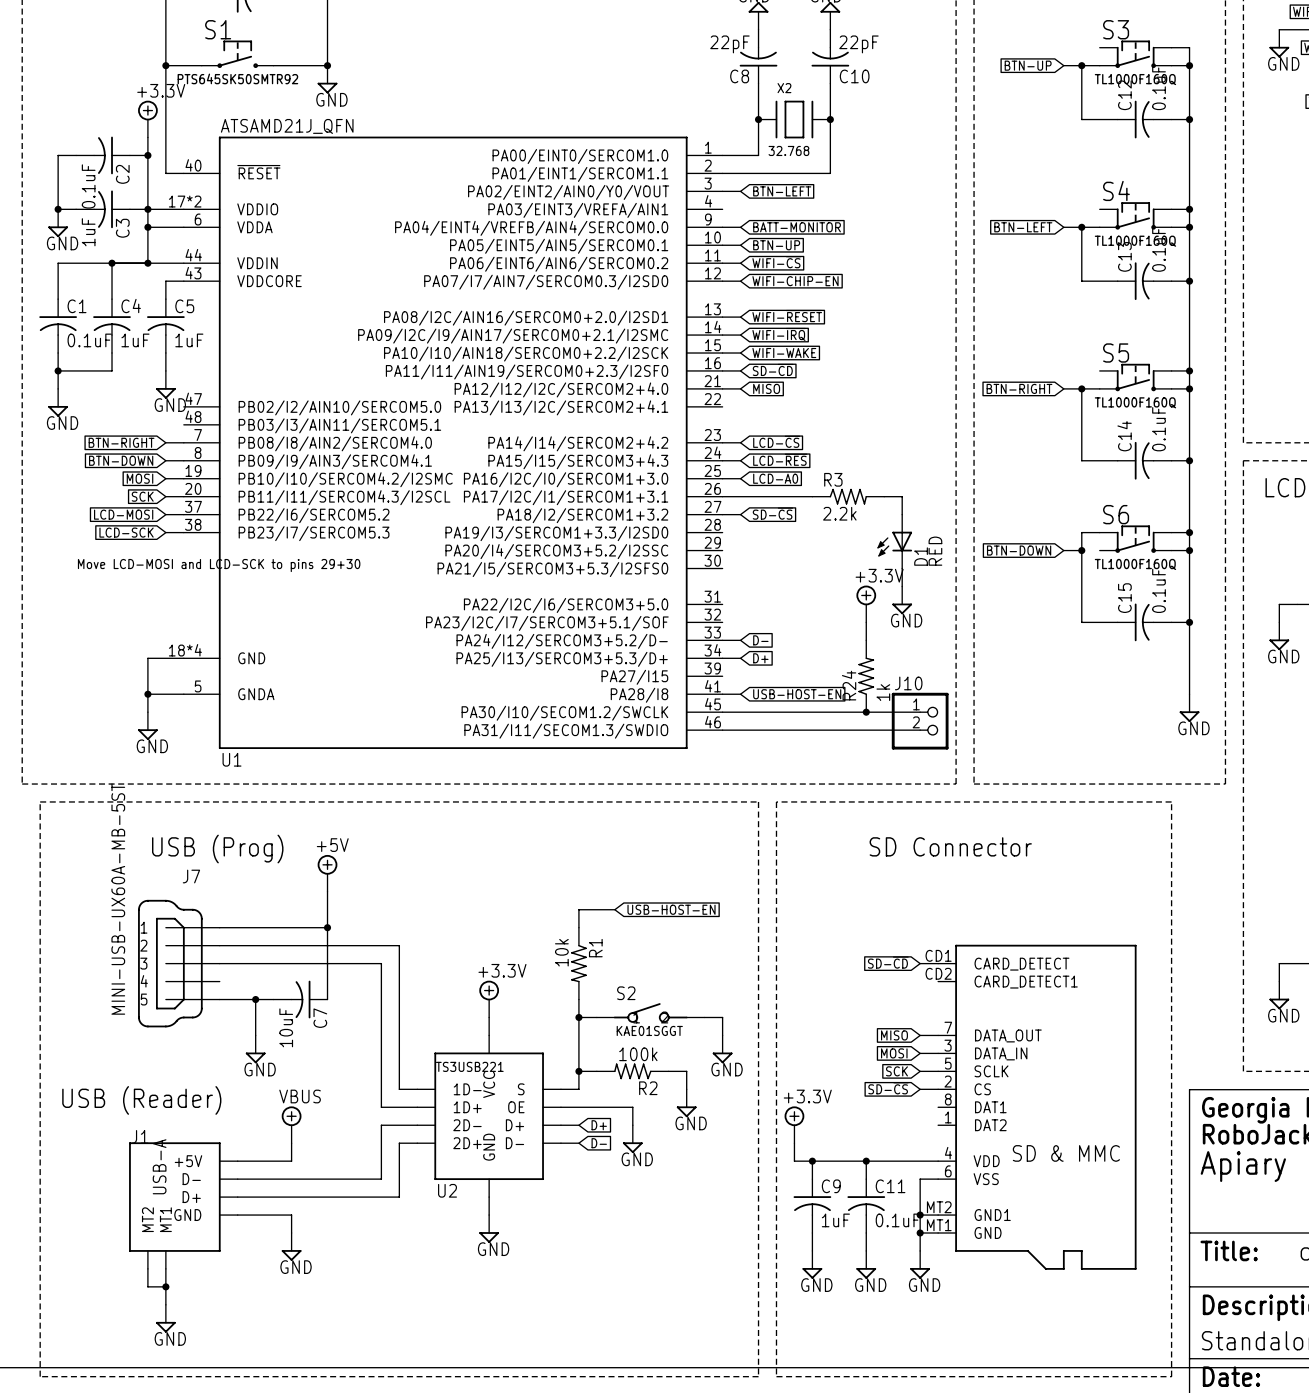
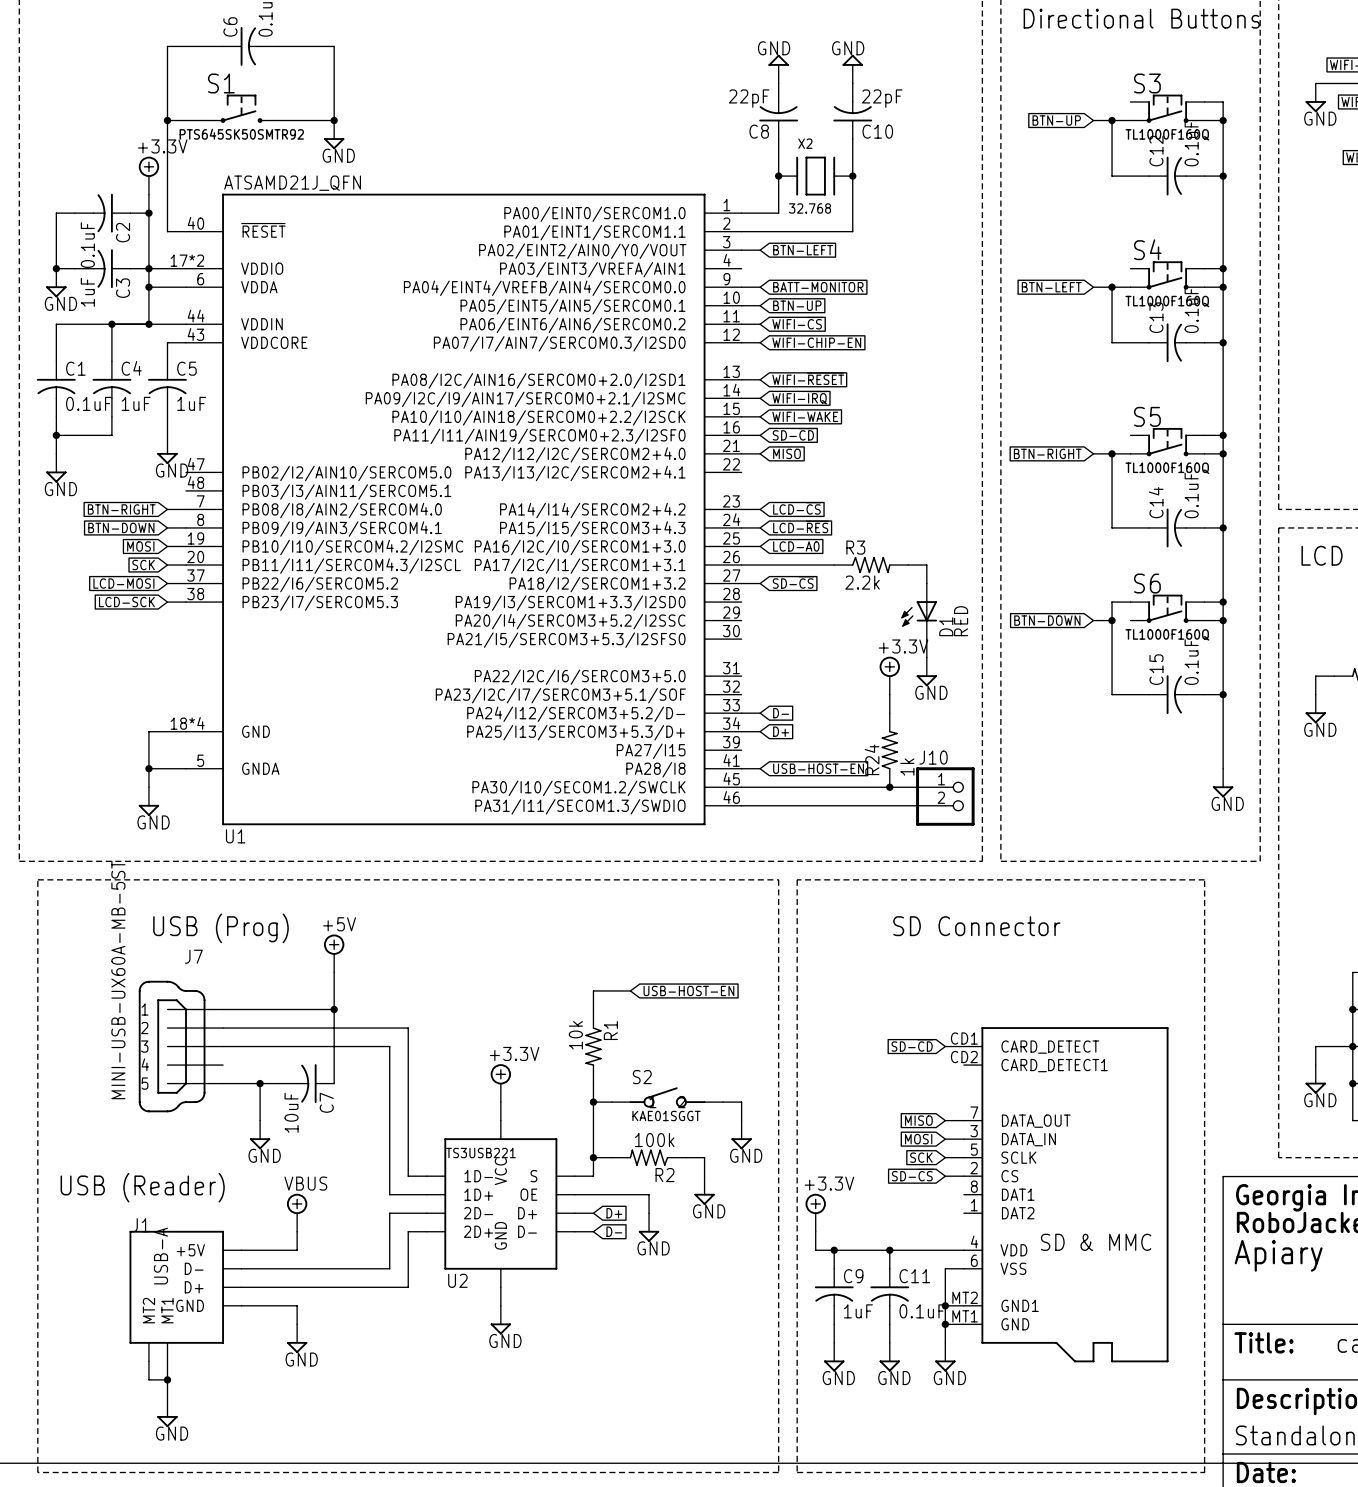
text: Move LCD-MOSI and LCD-SCK to pins 29+30 (219, 565) -> none

